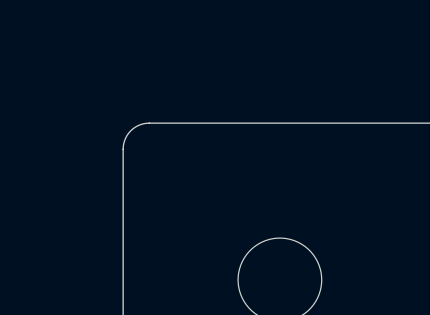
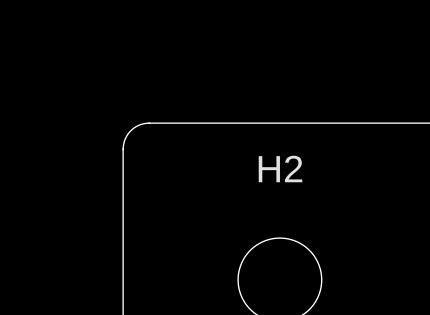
H2 name: none -> H2 (280, 168)

